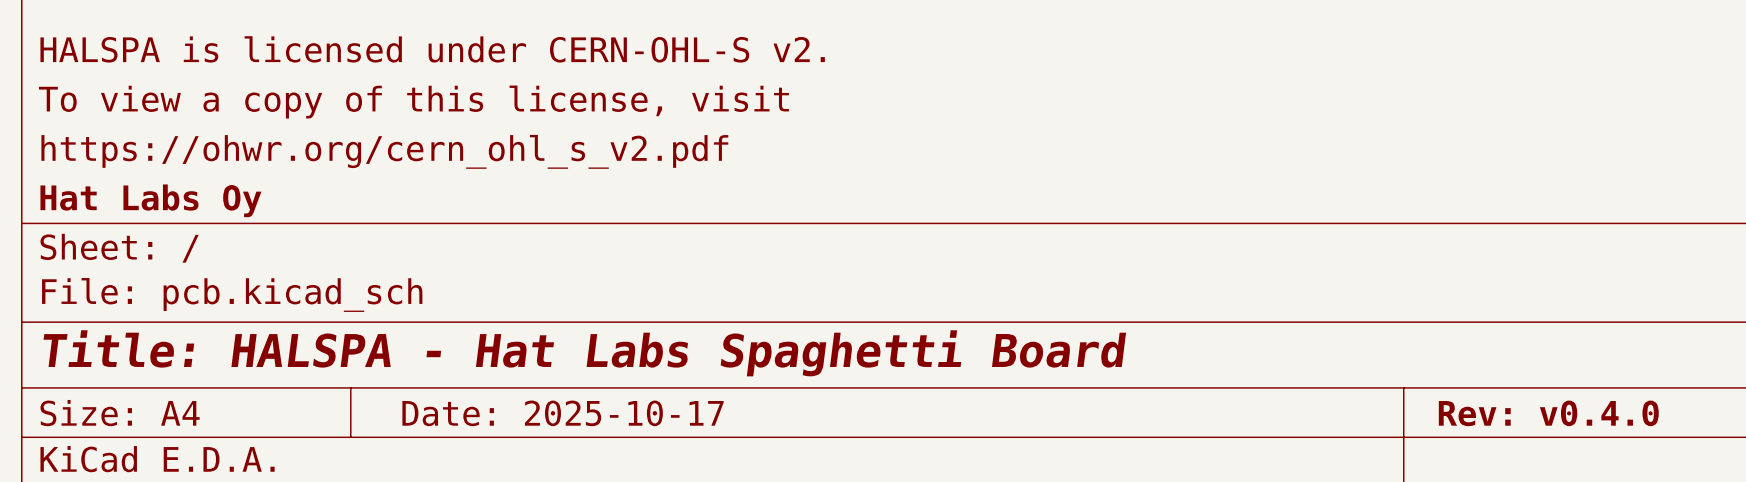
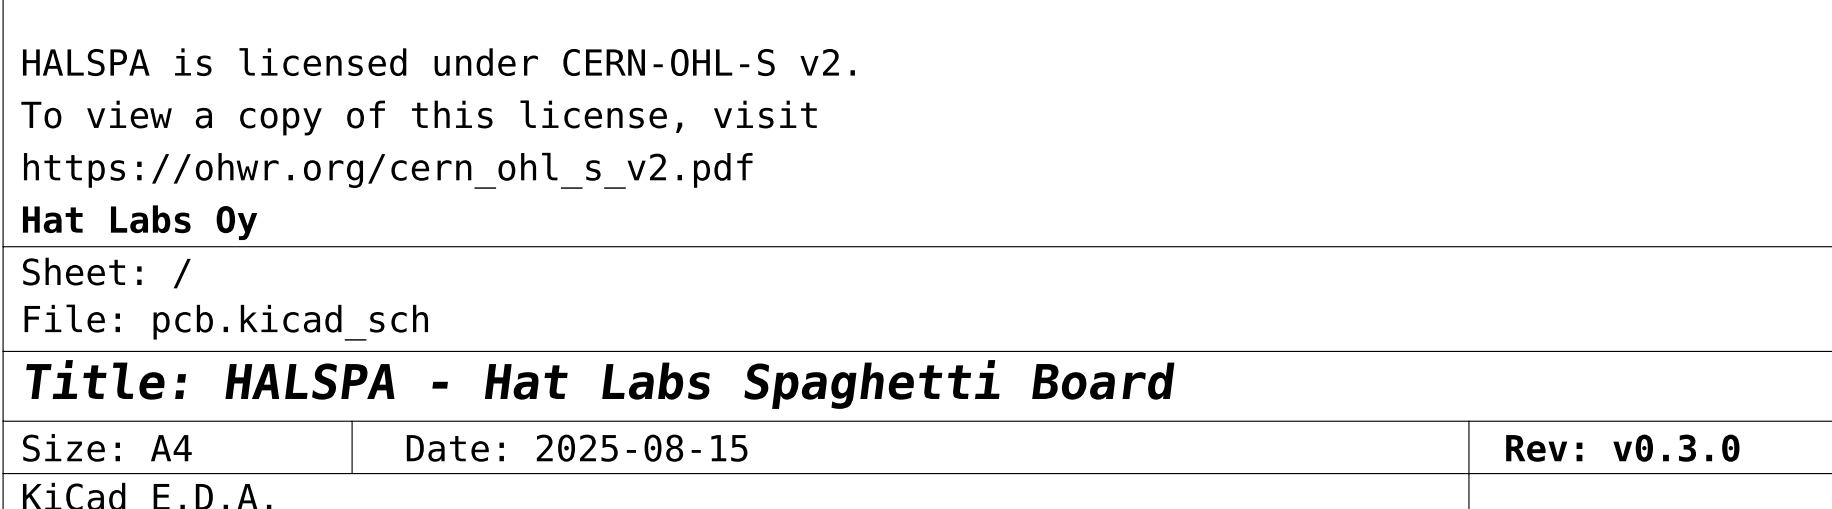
title block: Date: 2025-10-17 (563, 413) -> Date: 2025-08-15 (577, 448)
title block: Rev: v0.4.0 (1548, 413) -> Rev: v0.3.0 (1622, 448)

